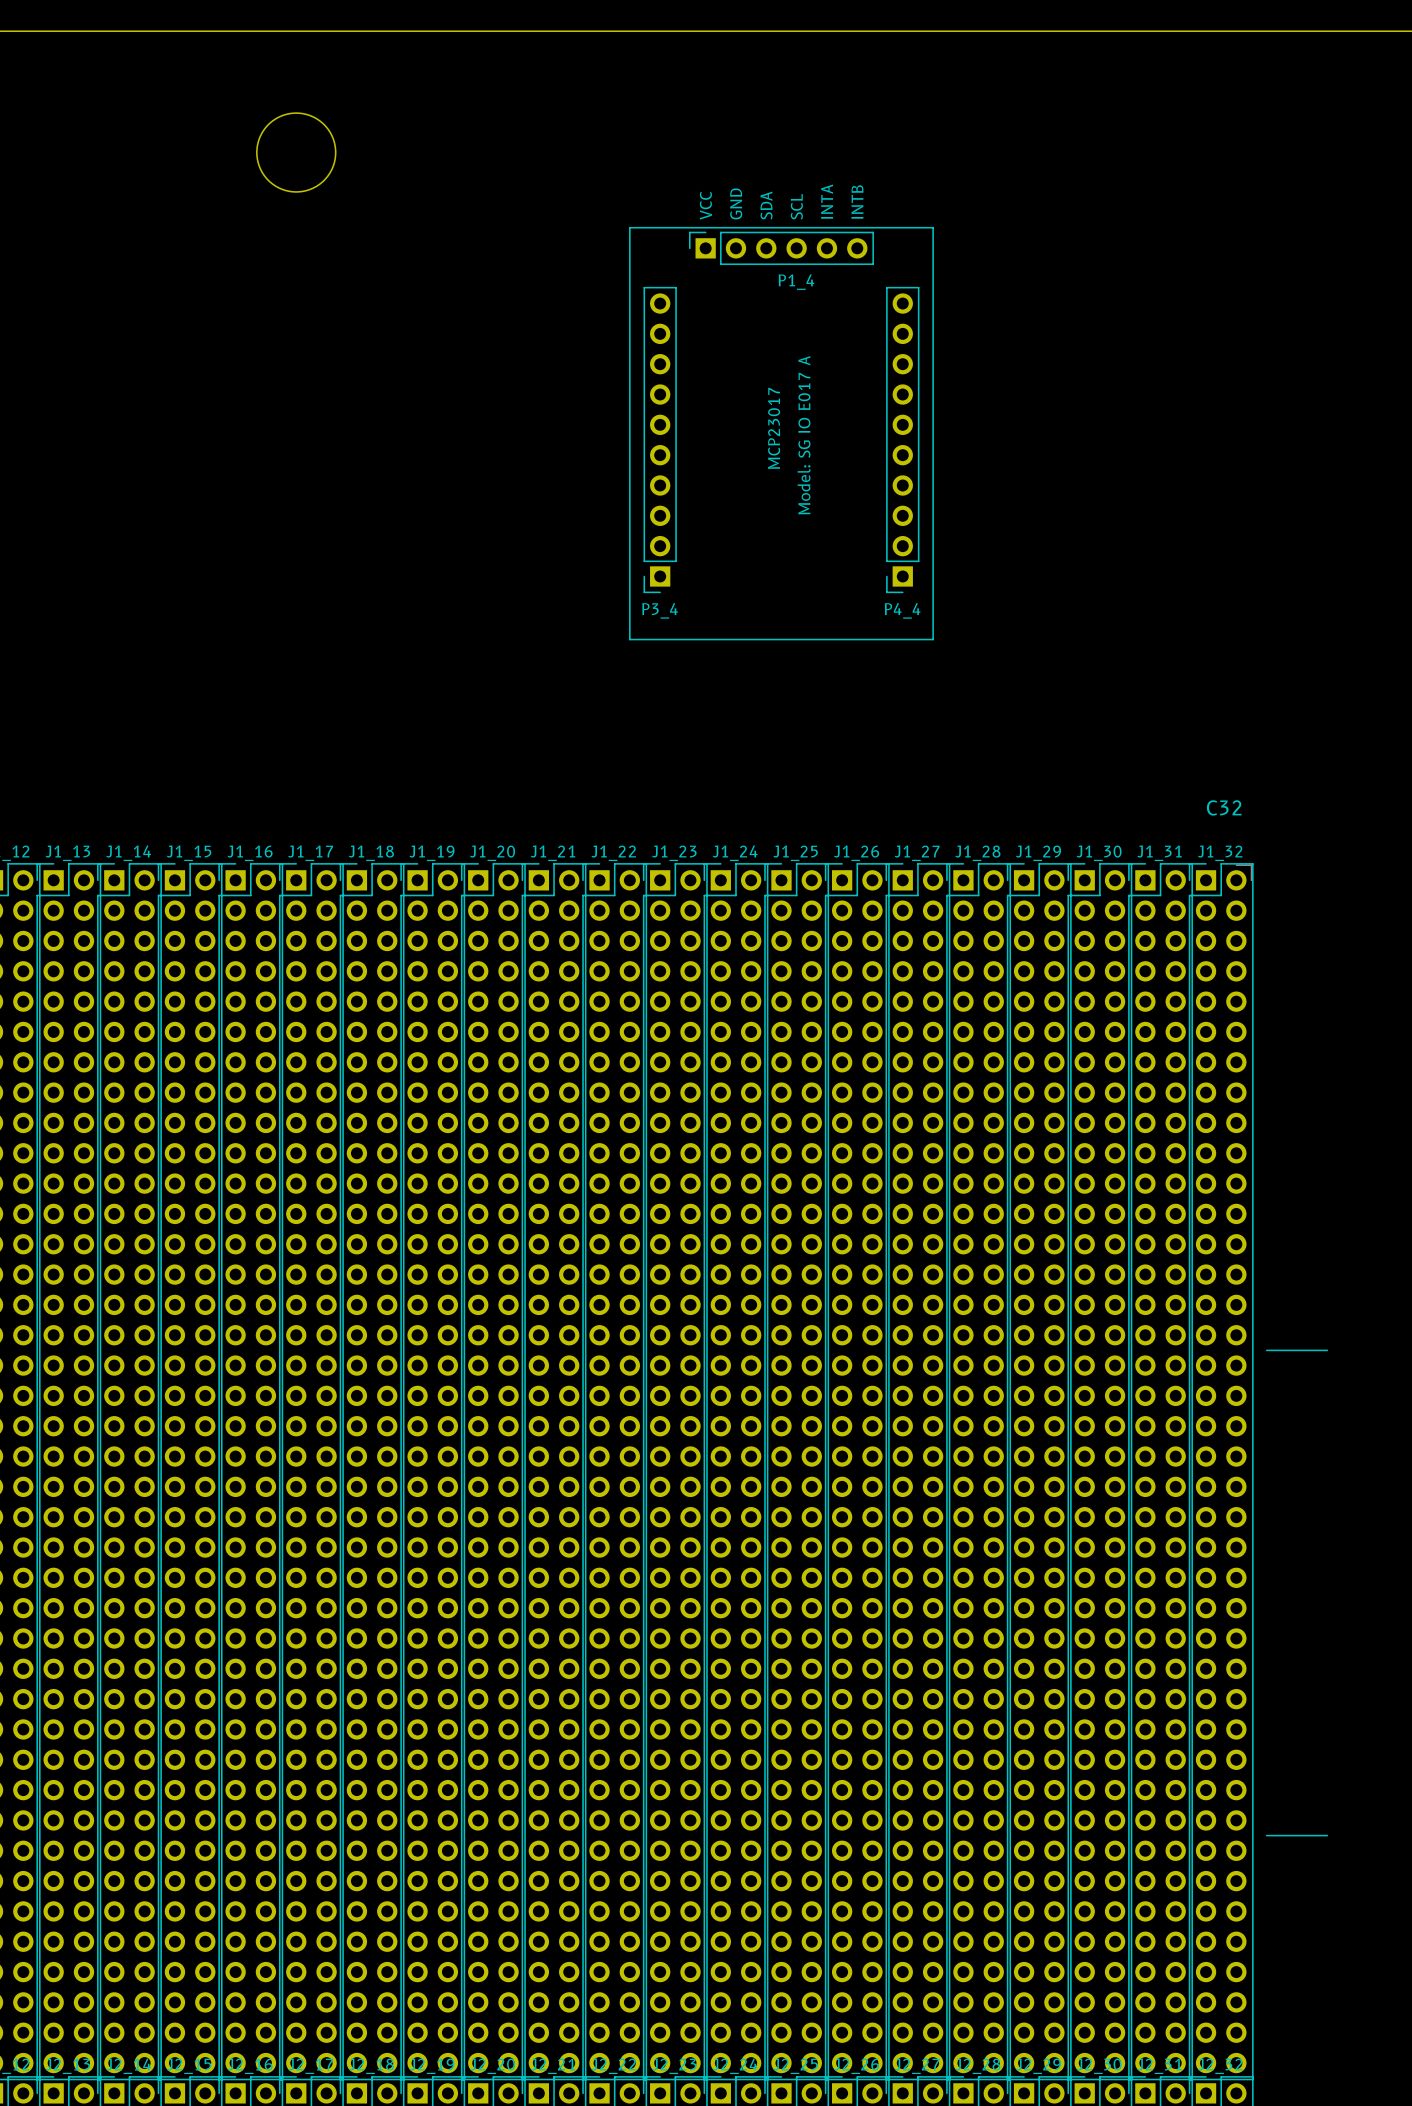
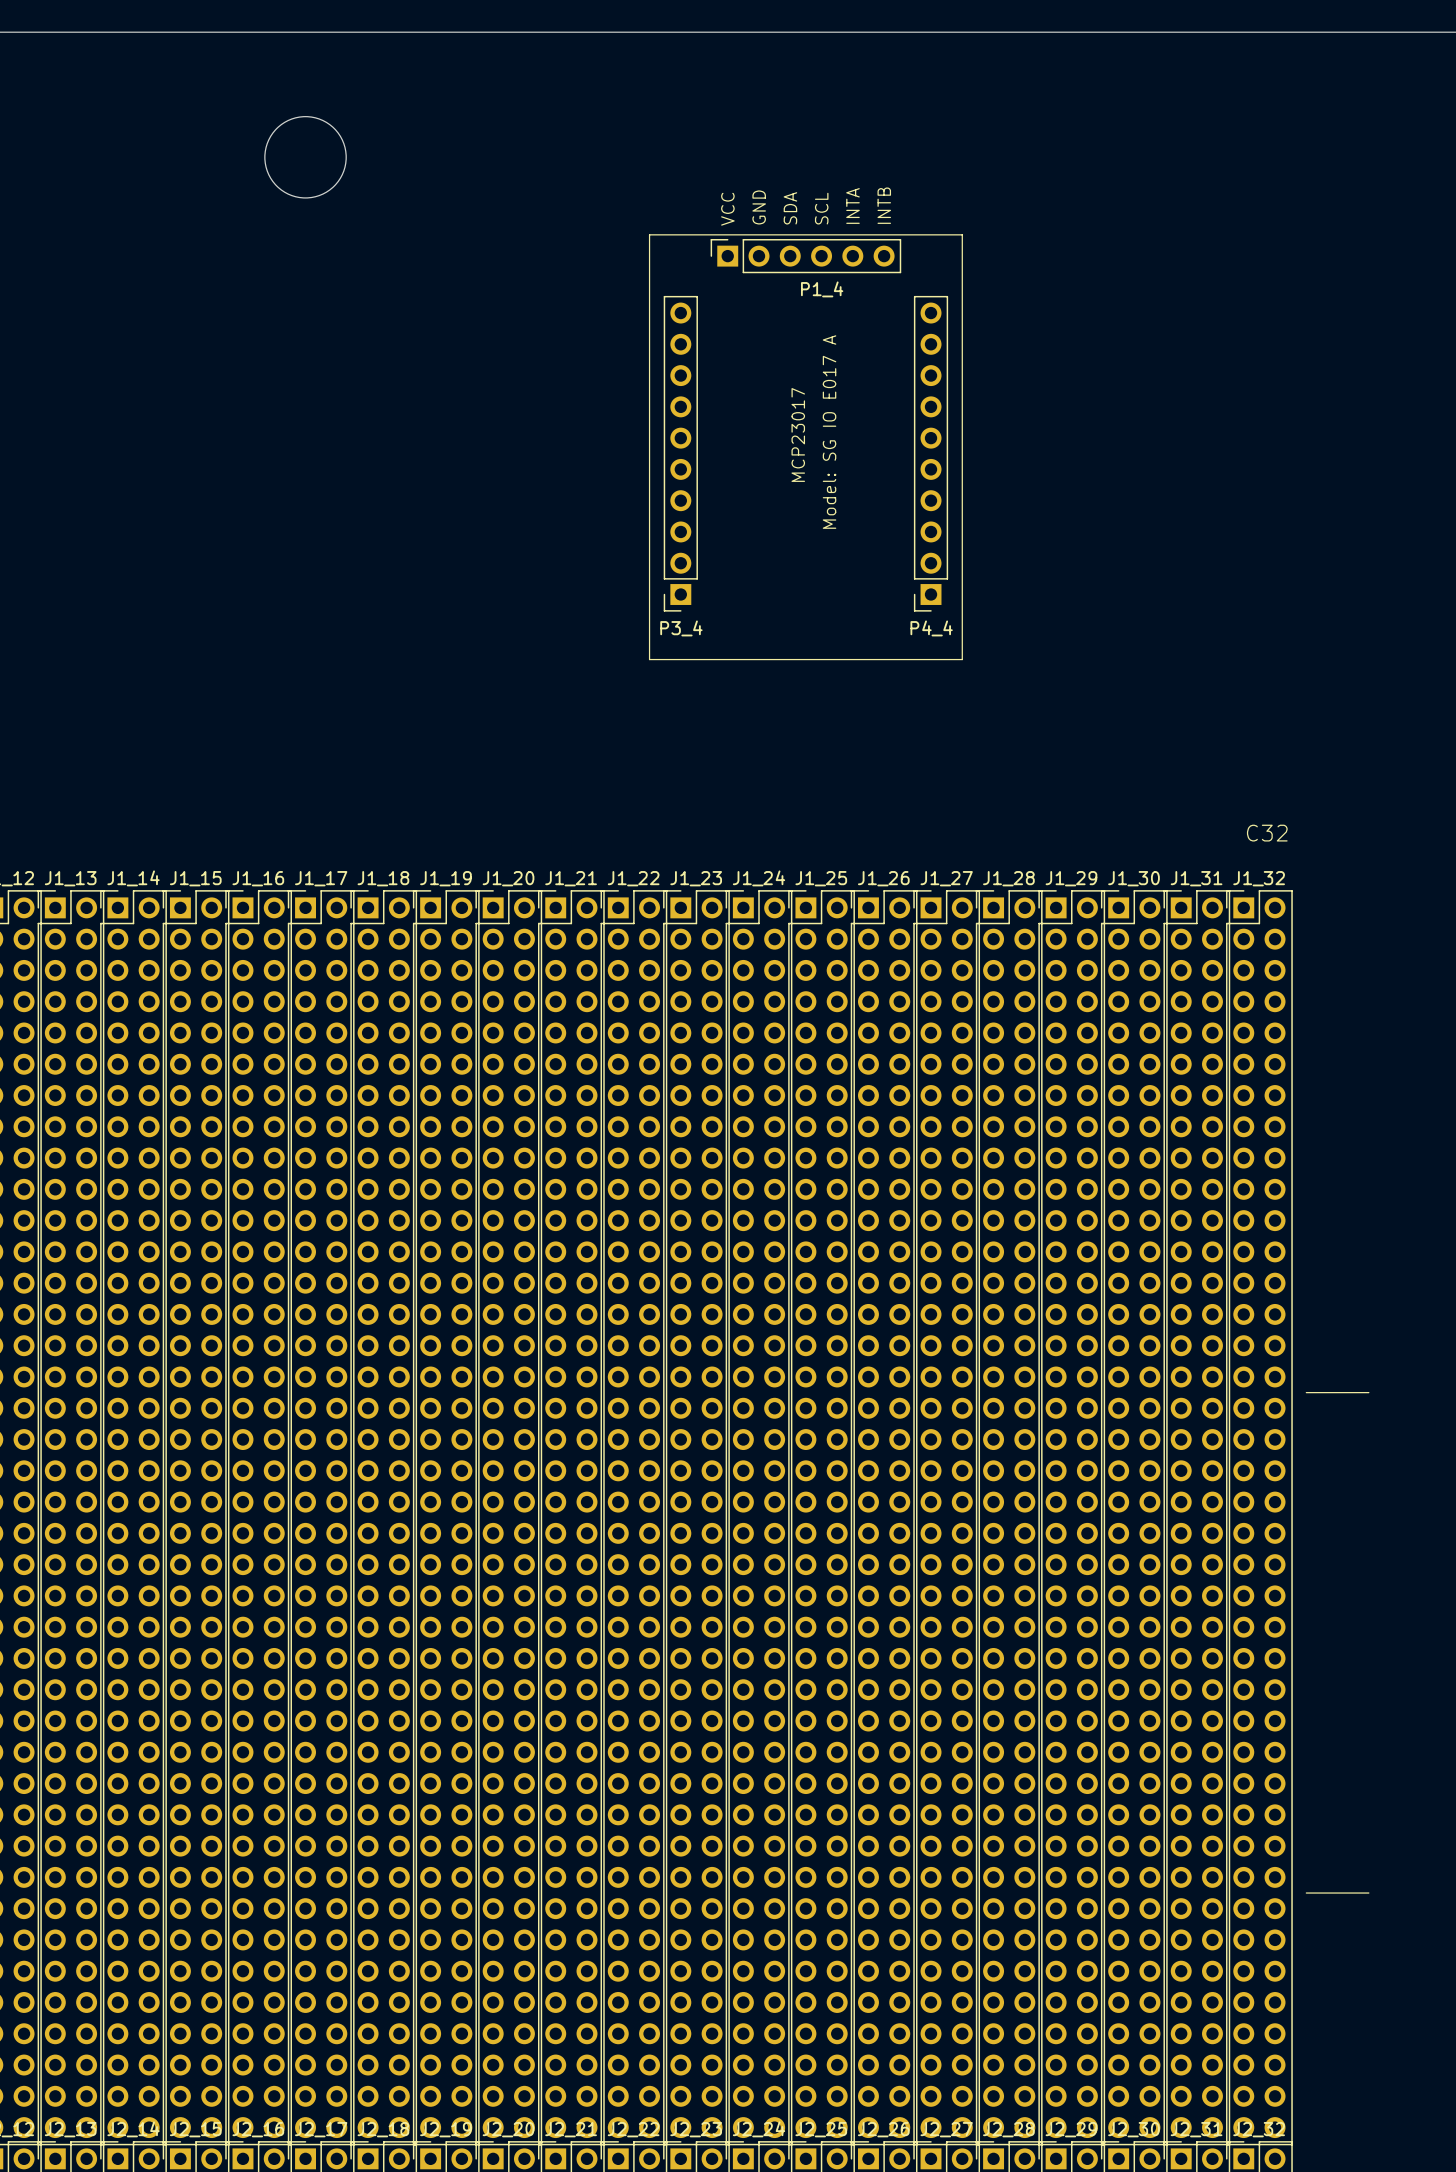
line: (1236, 865) (1251, 865) (1251, 880) -> none

